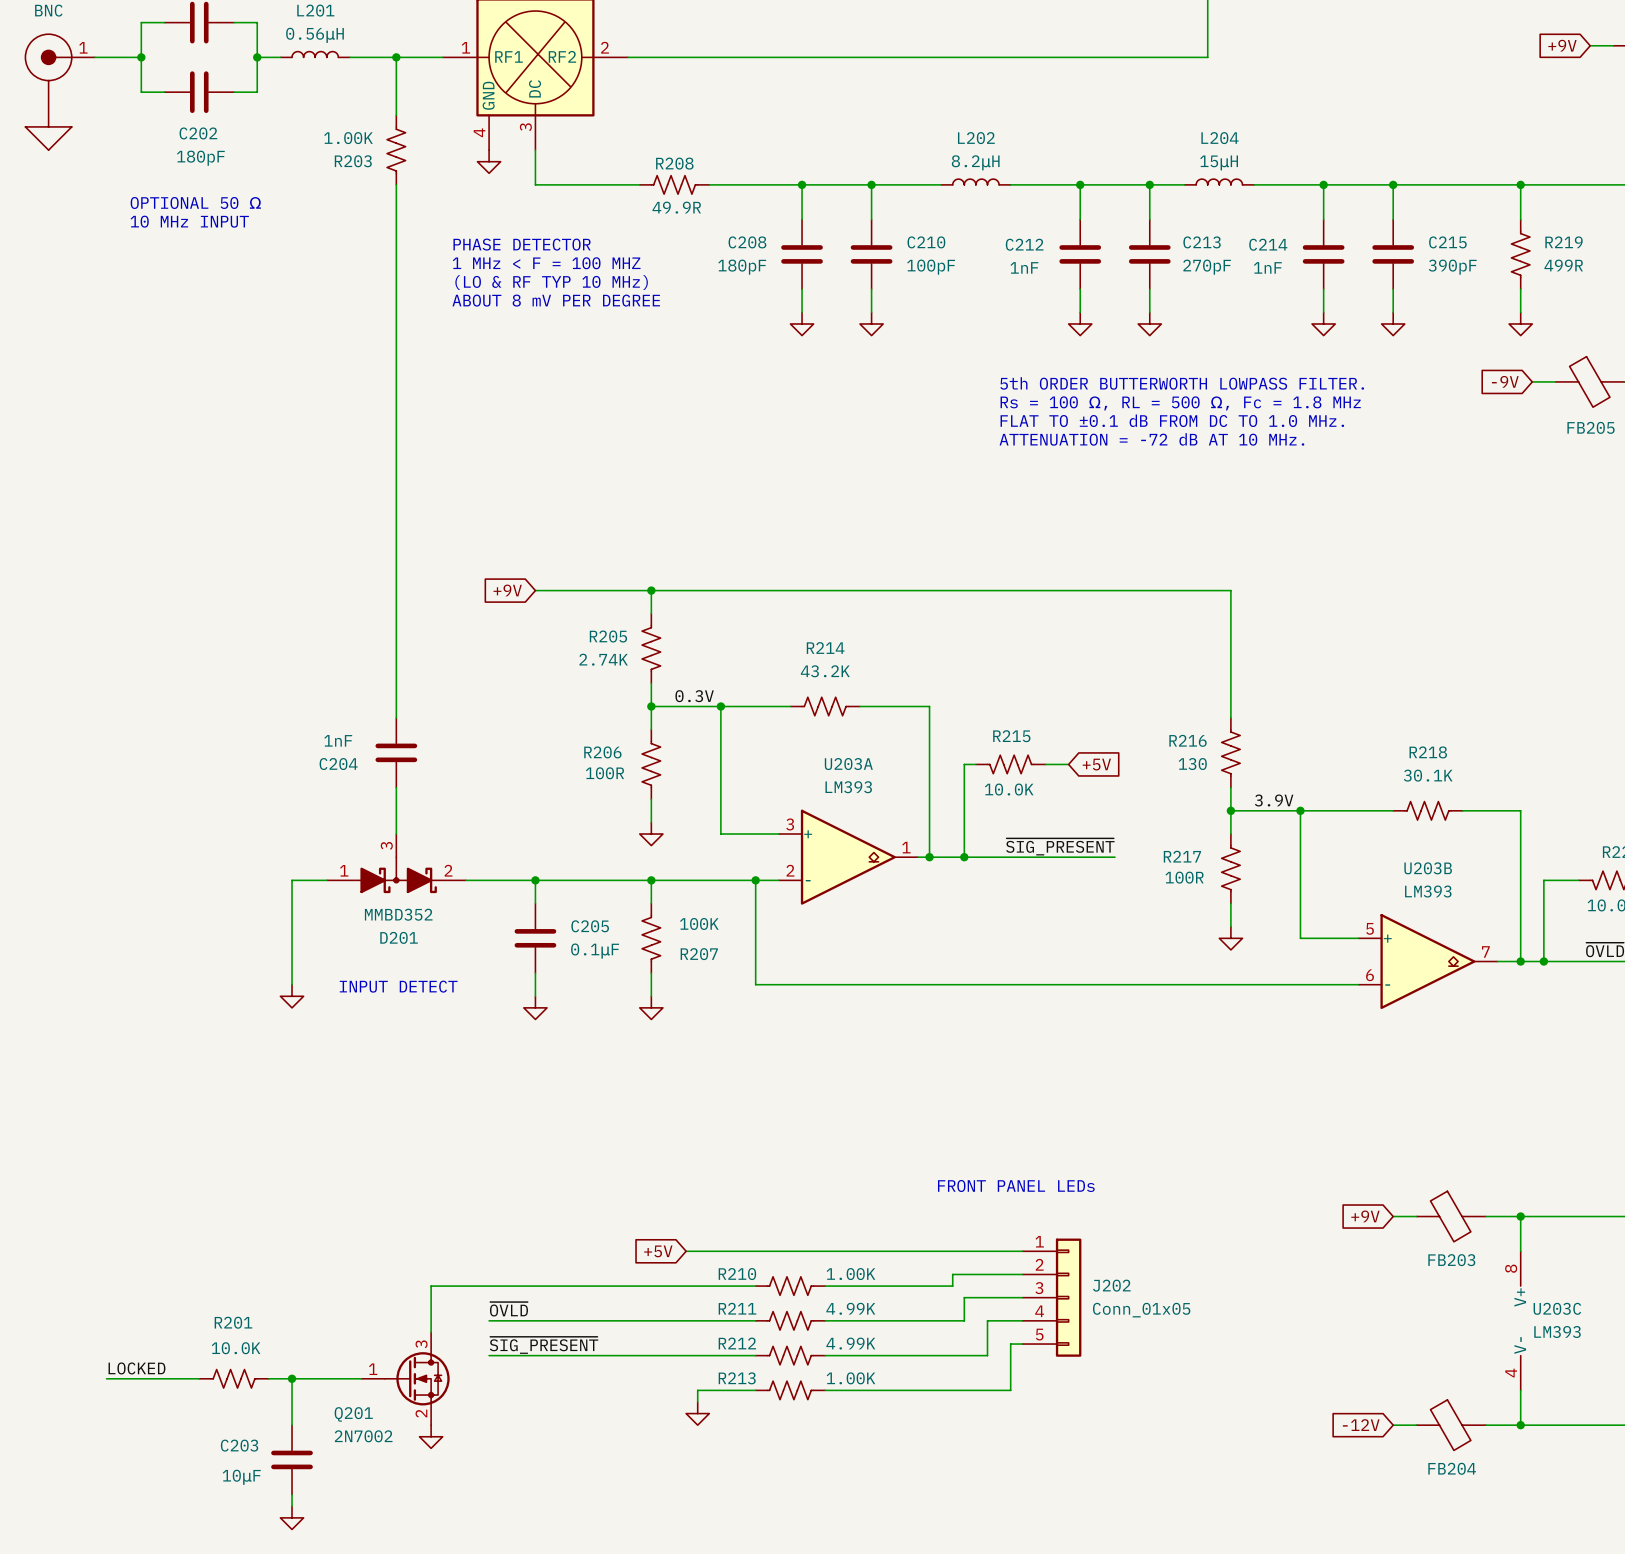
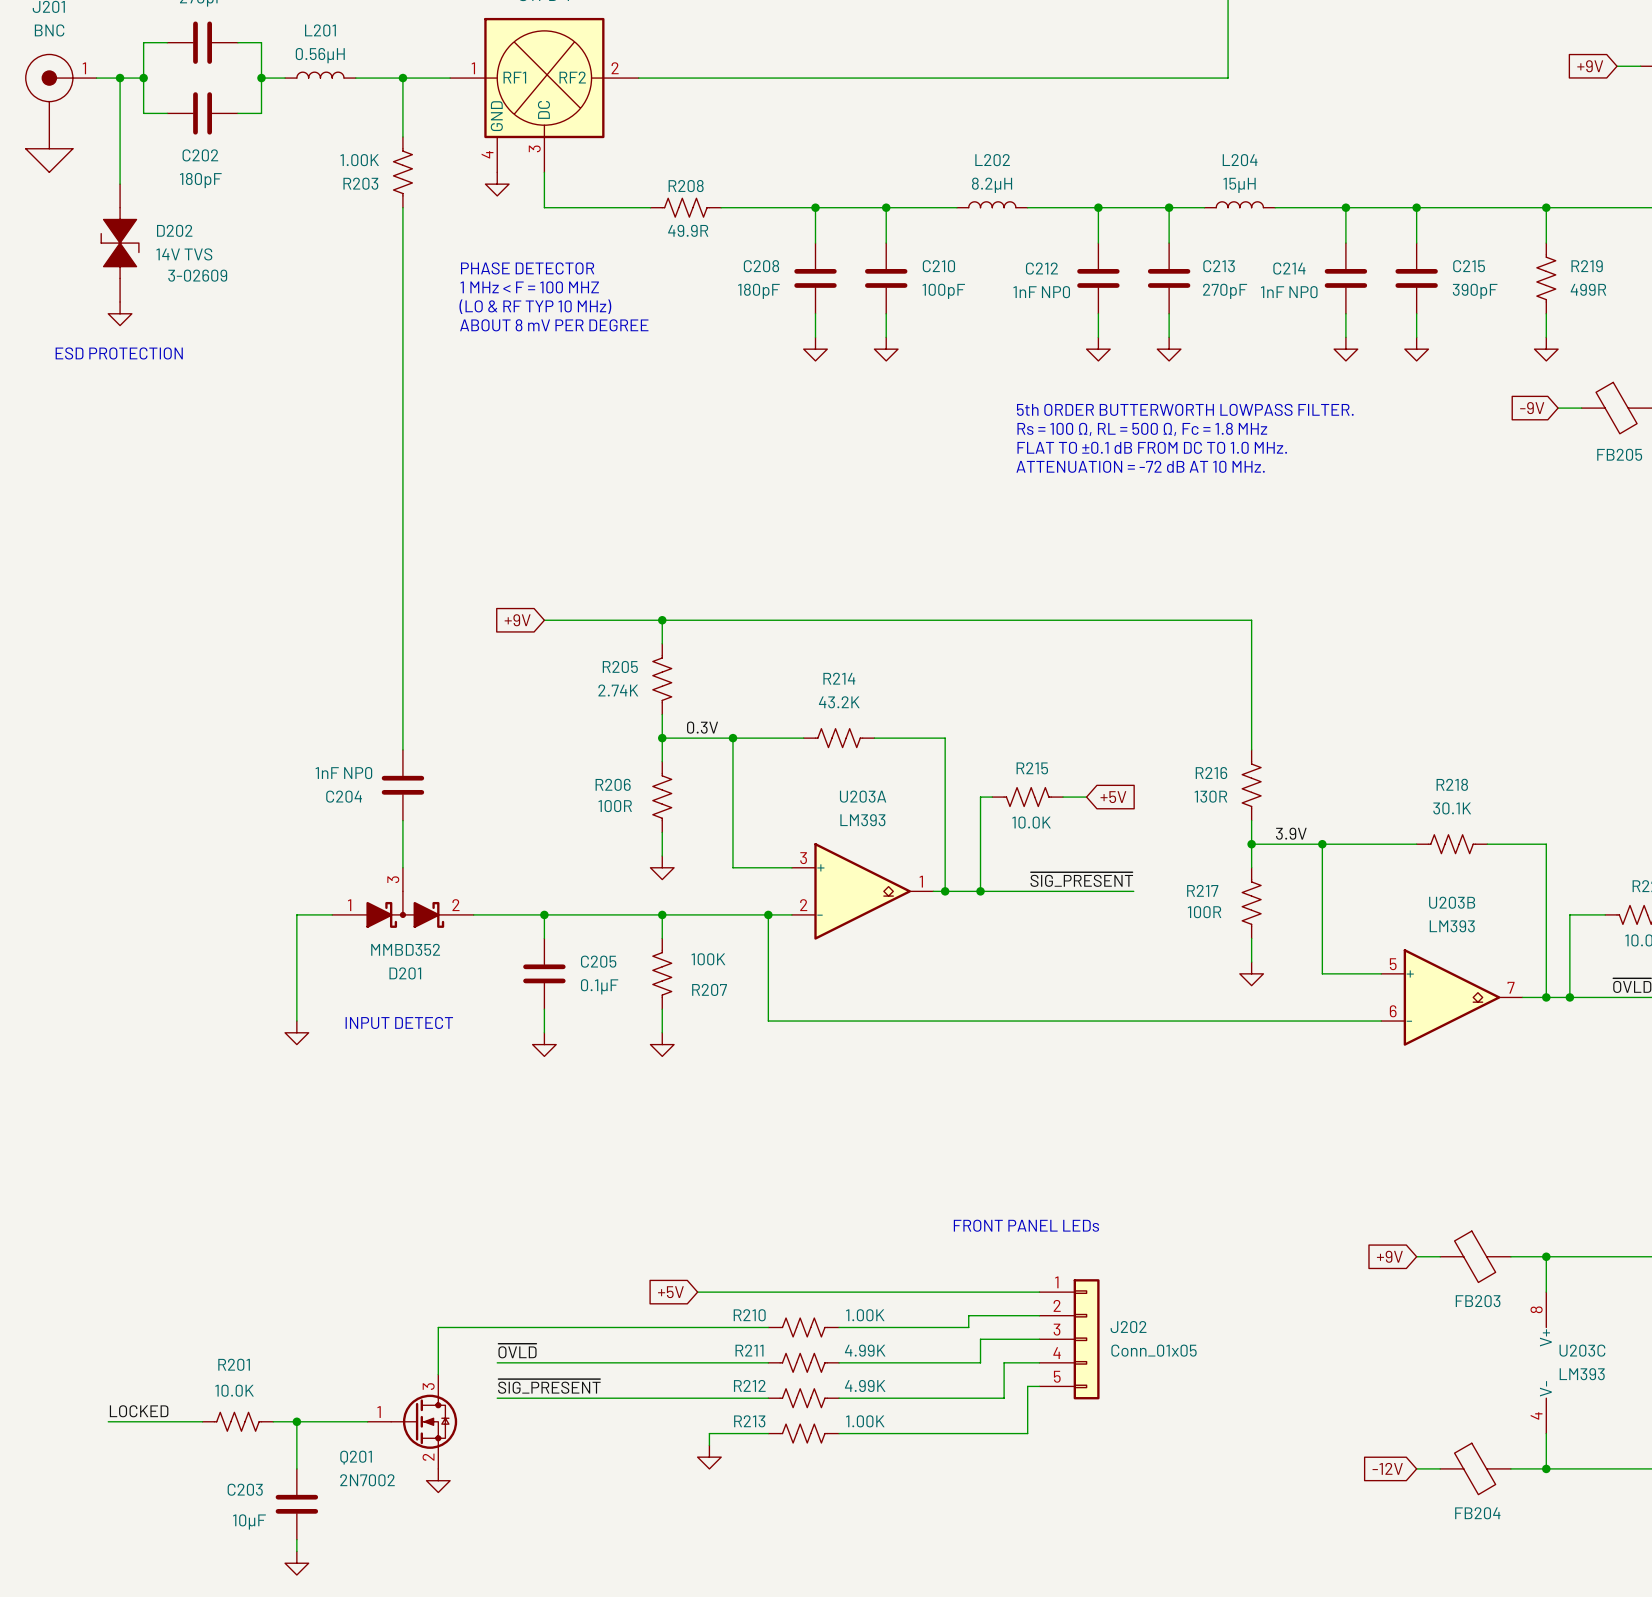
wire: none -> (120, 78) (120, 184)
junction: none -> (120, 78)
text: OPTIONAL 50 Ω (195, 202) -> none
D202: none -> 14V TVS (120, 243)
text: 10 MHz INPUT (189, 221) -> none
C212 value: 1nF (1024, 267) -> 1nF NP0 (1041, 292)
C214 value: 1nF (1267, 267) -> 1nF NP0 (1289, 292)
power symbol: none -> (120, 313)
text: none -> ESD PROTECTION (119, 353)
C204 value: 1nF (338, 740) -> 1nF NP0 (343, 773)
R216 value: 130 (1192, 764) -> 130R (1210, 796)

